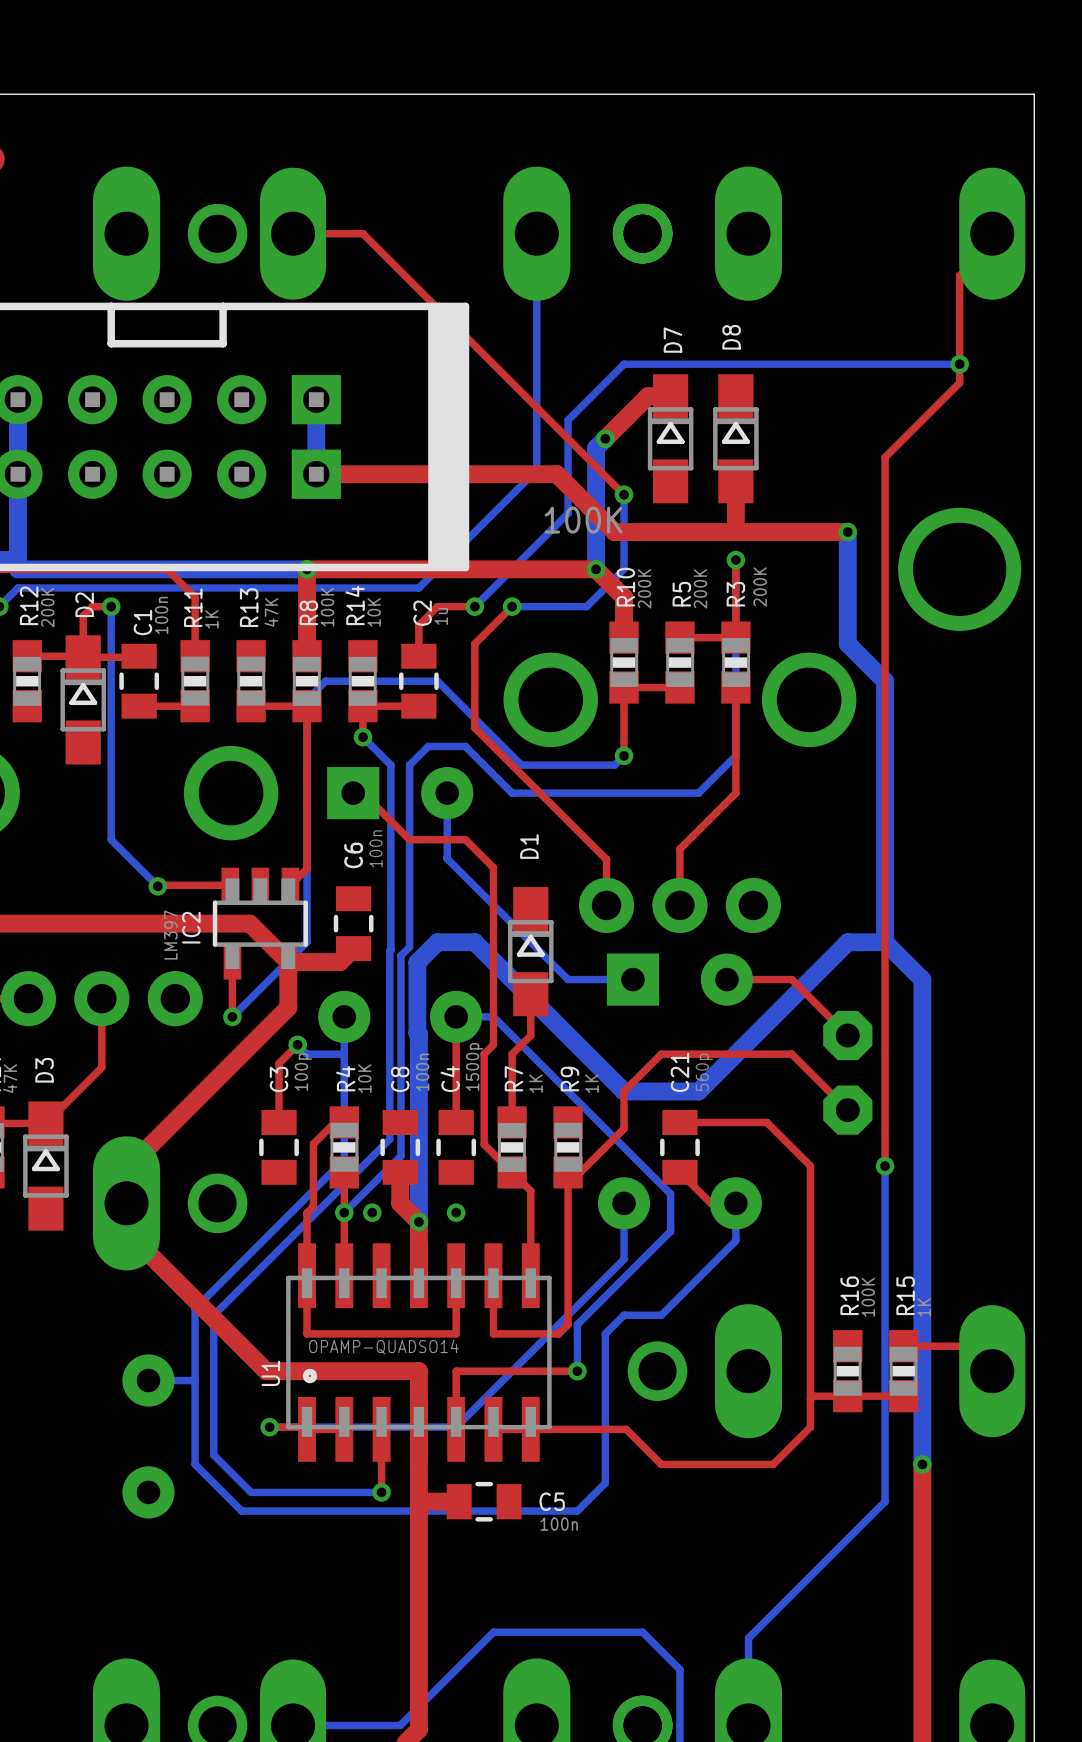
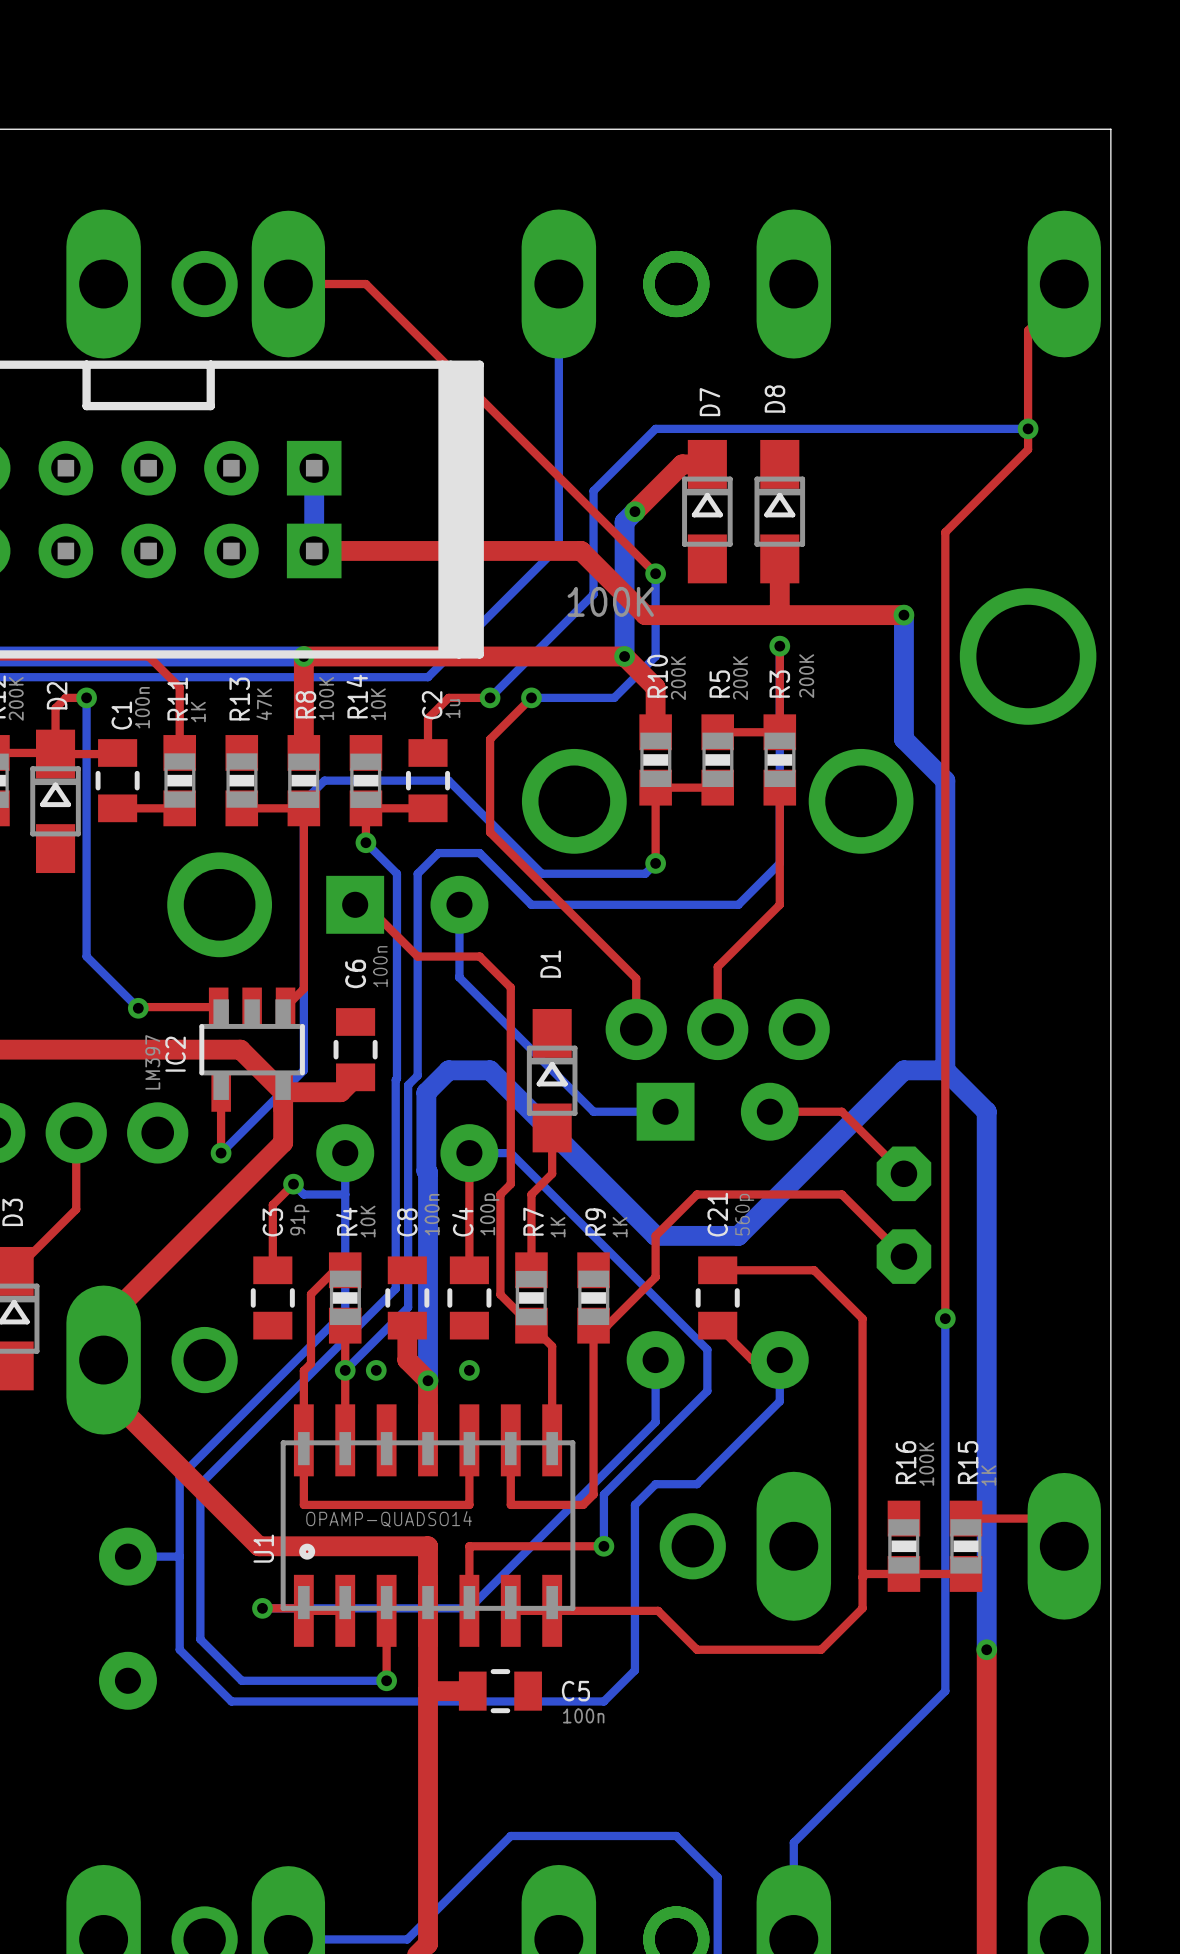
C4 value: 1500p (474, 1067) -> 100p (489, 1214)
C3 value: 100p (303, 1072) -> 91p (299, 1220)

